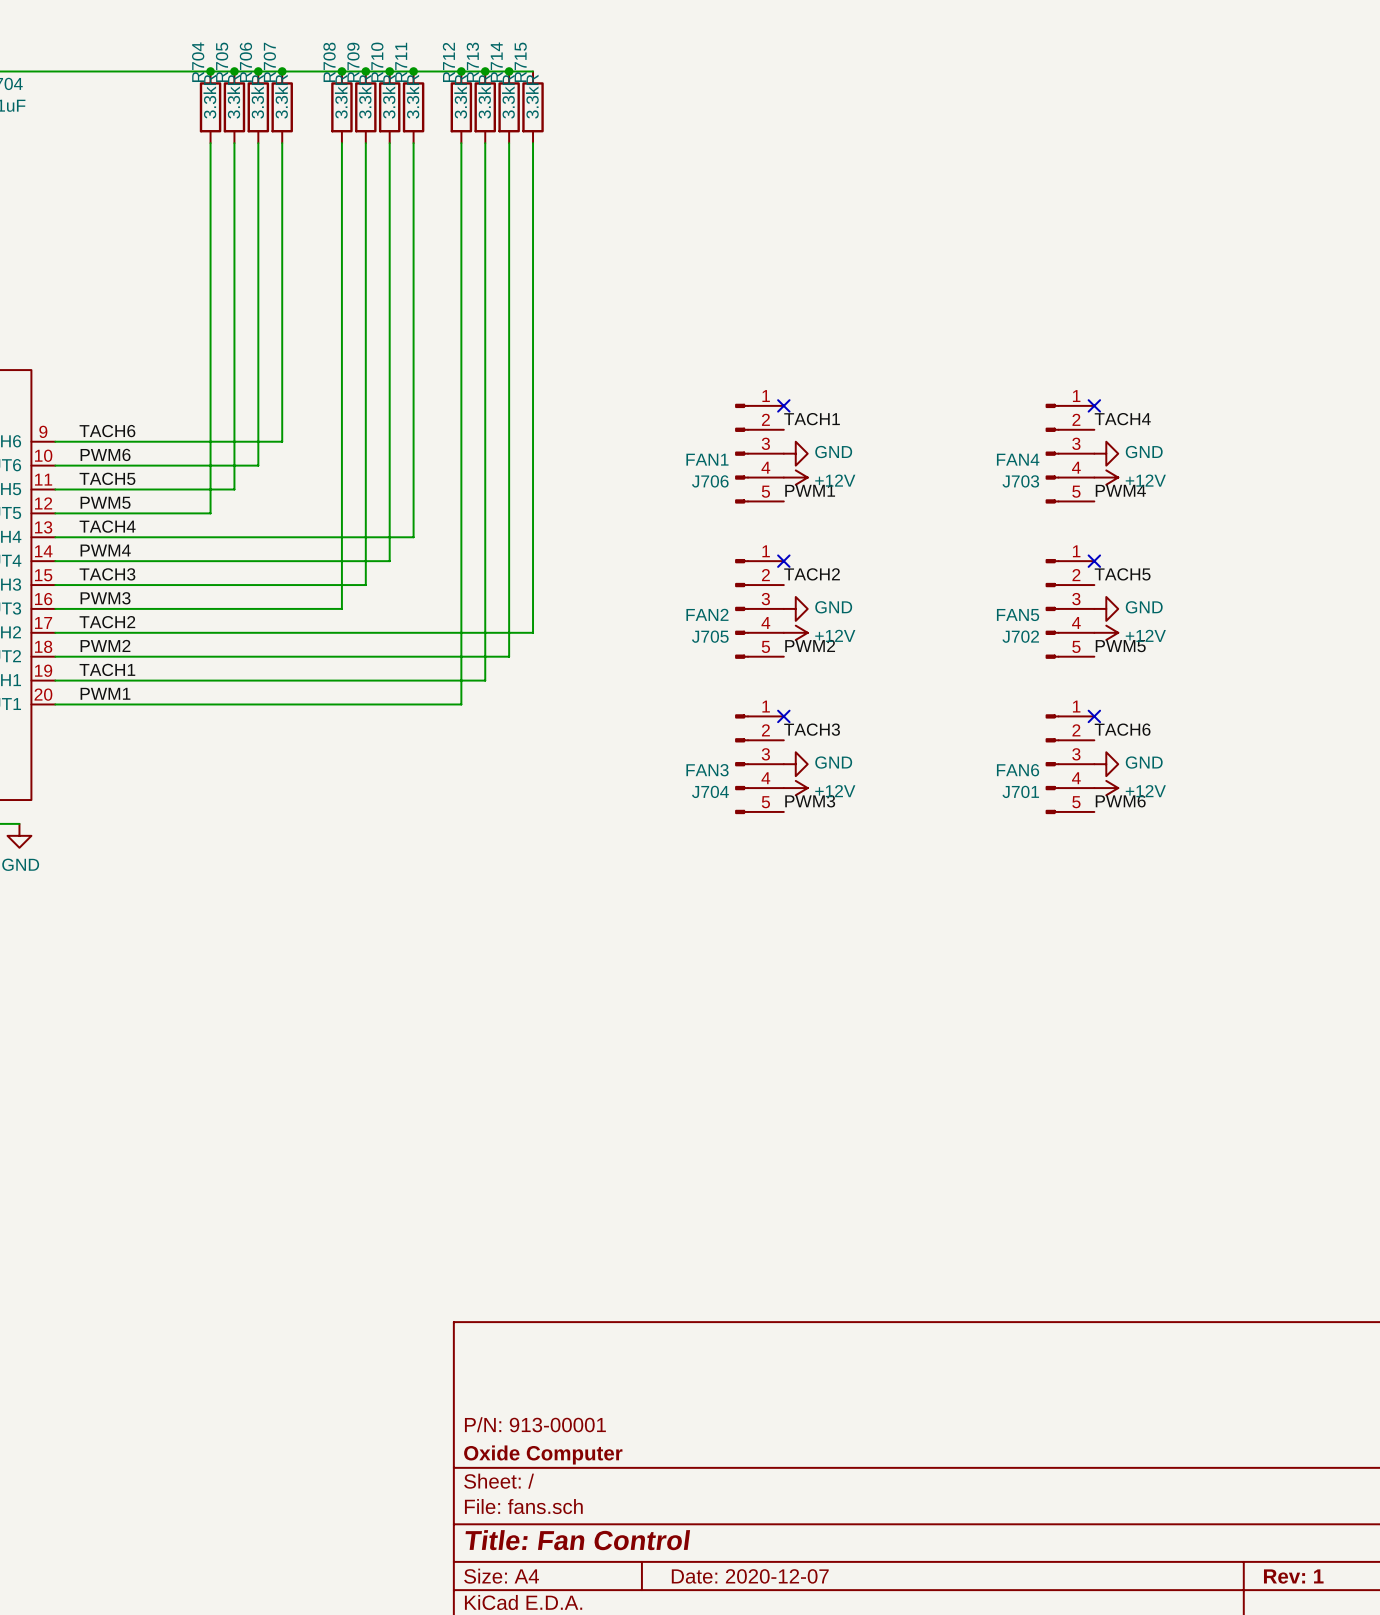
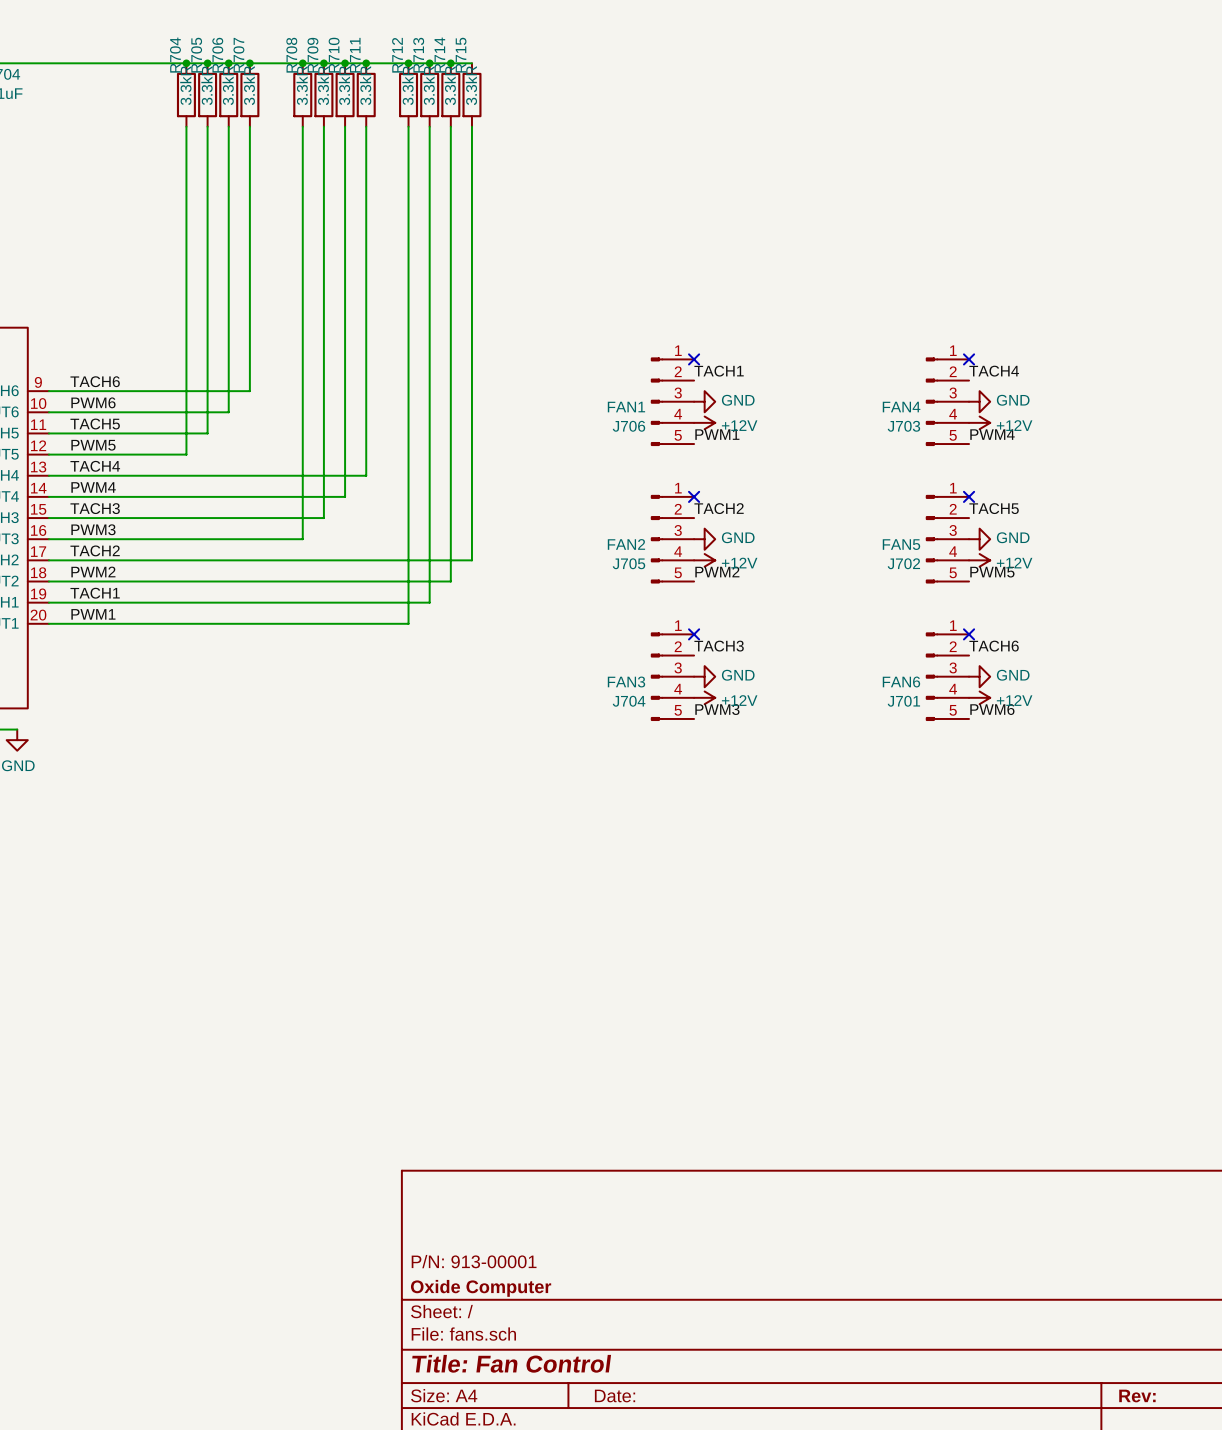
title block: Date: 2020-12-07 (750, 1576) -> Date: (615, 1396)
title block: Rev: 1 (1293, 1576) -> Rev: (1137, 1396)

